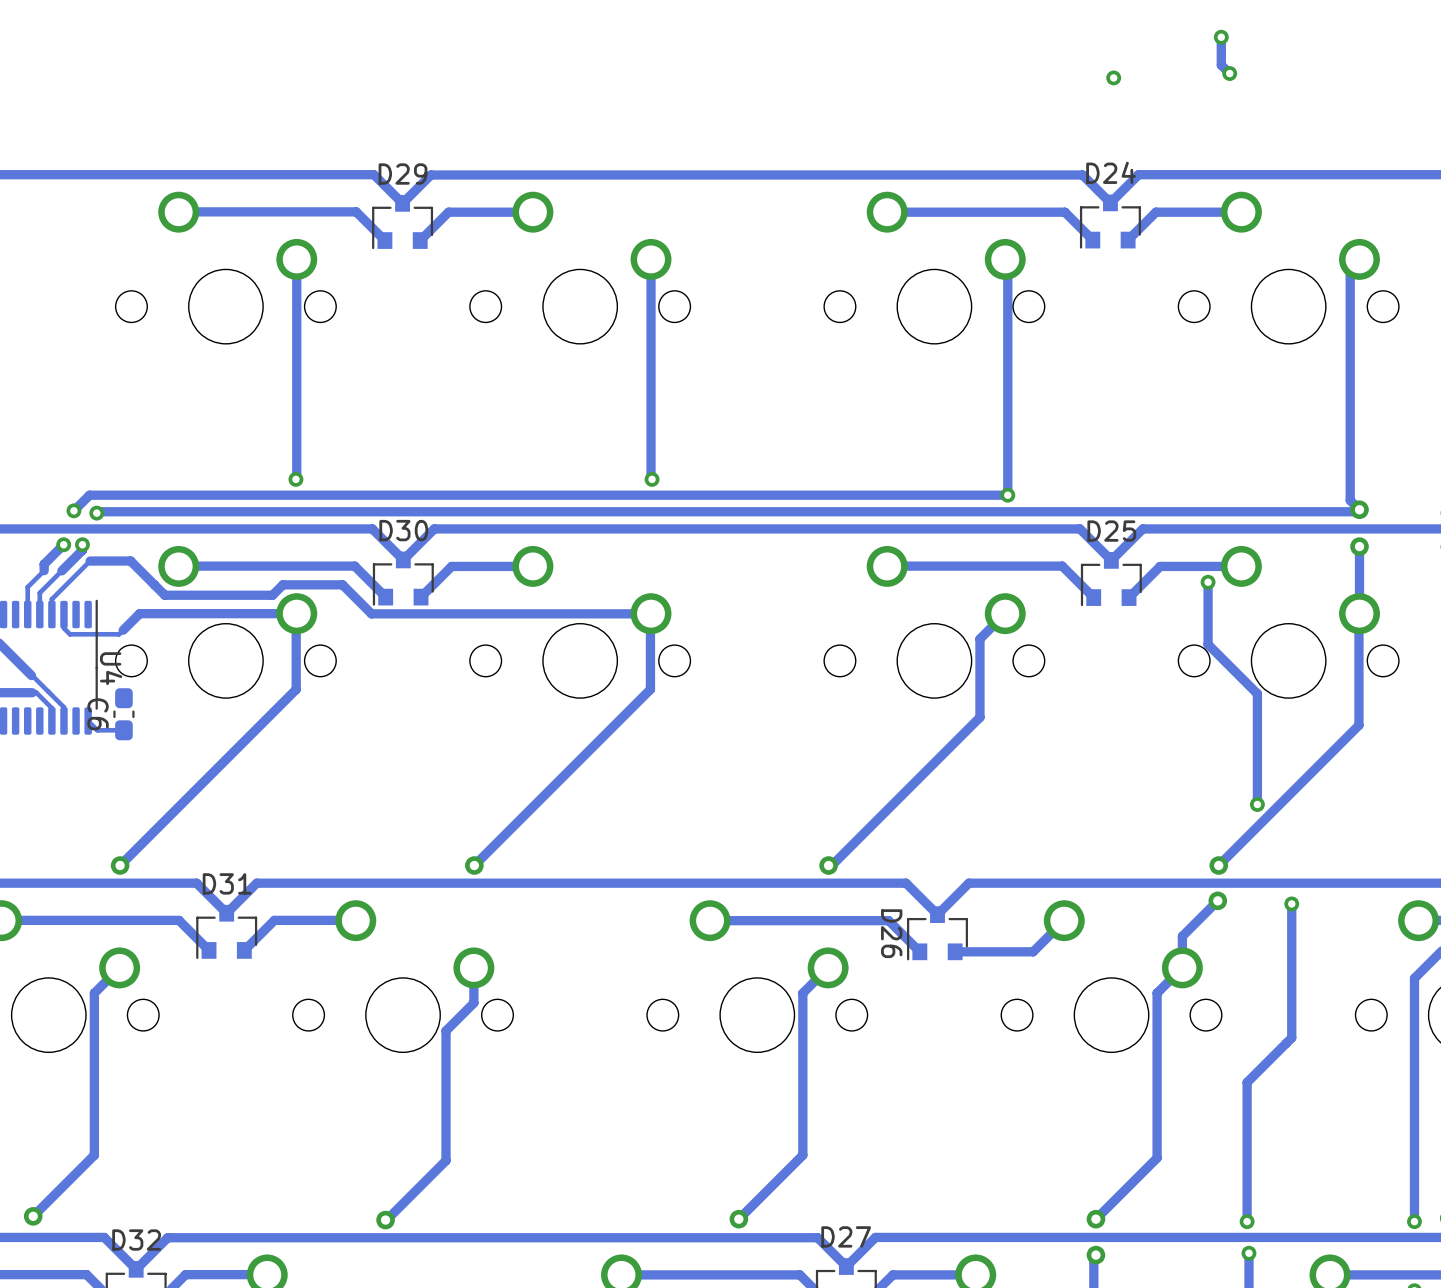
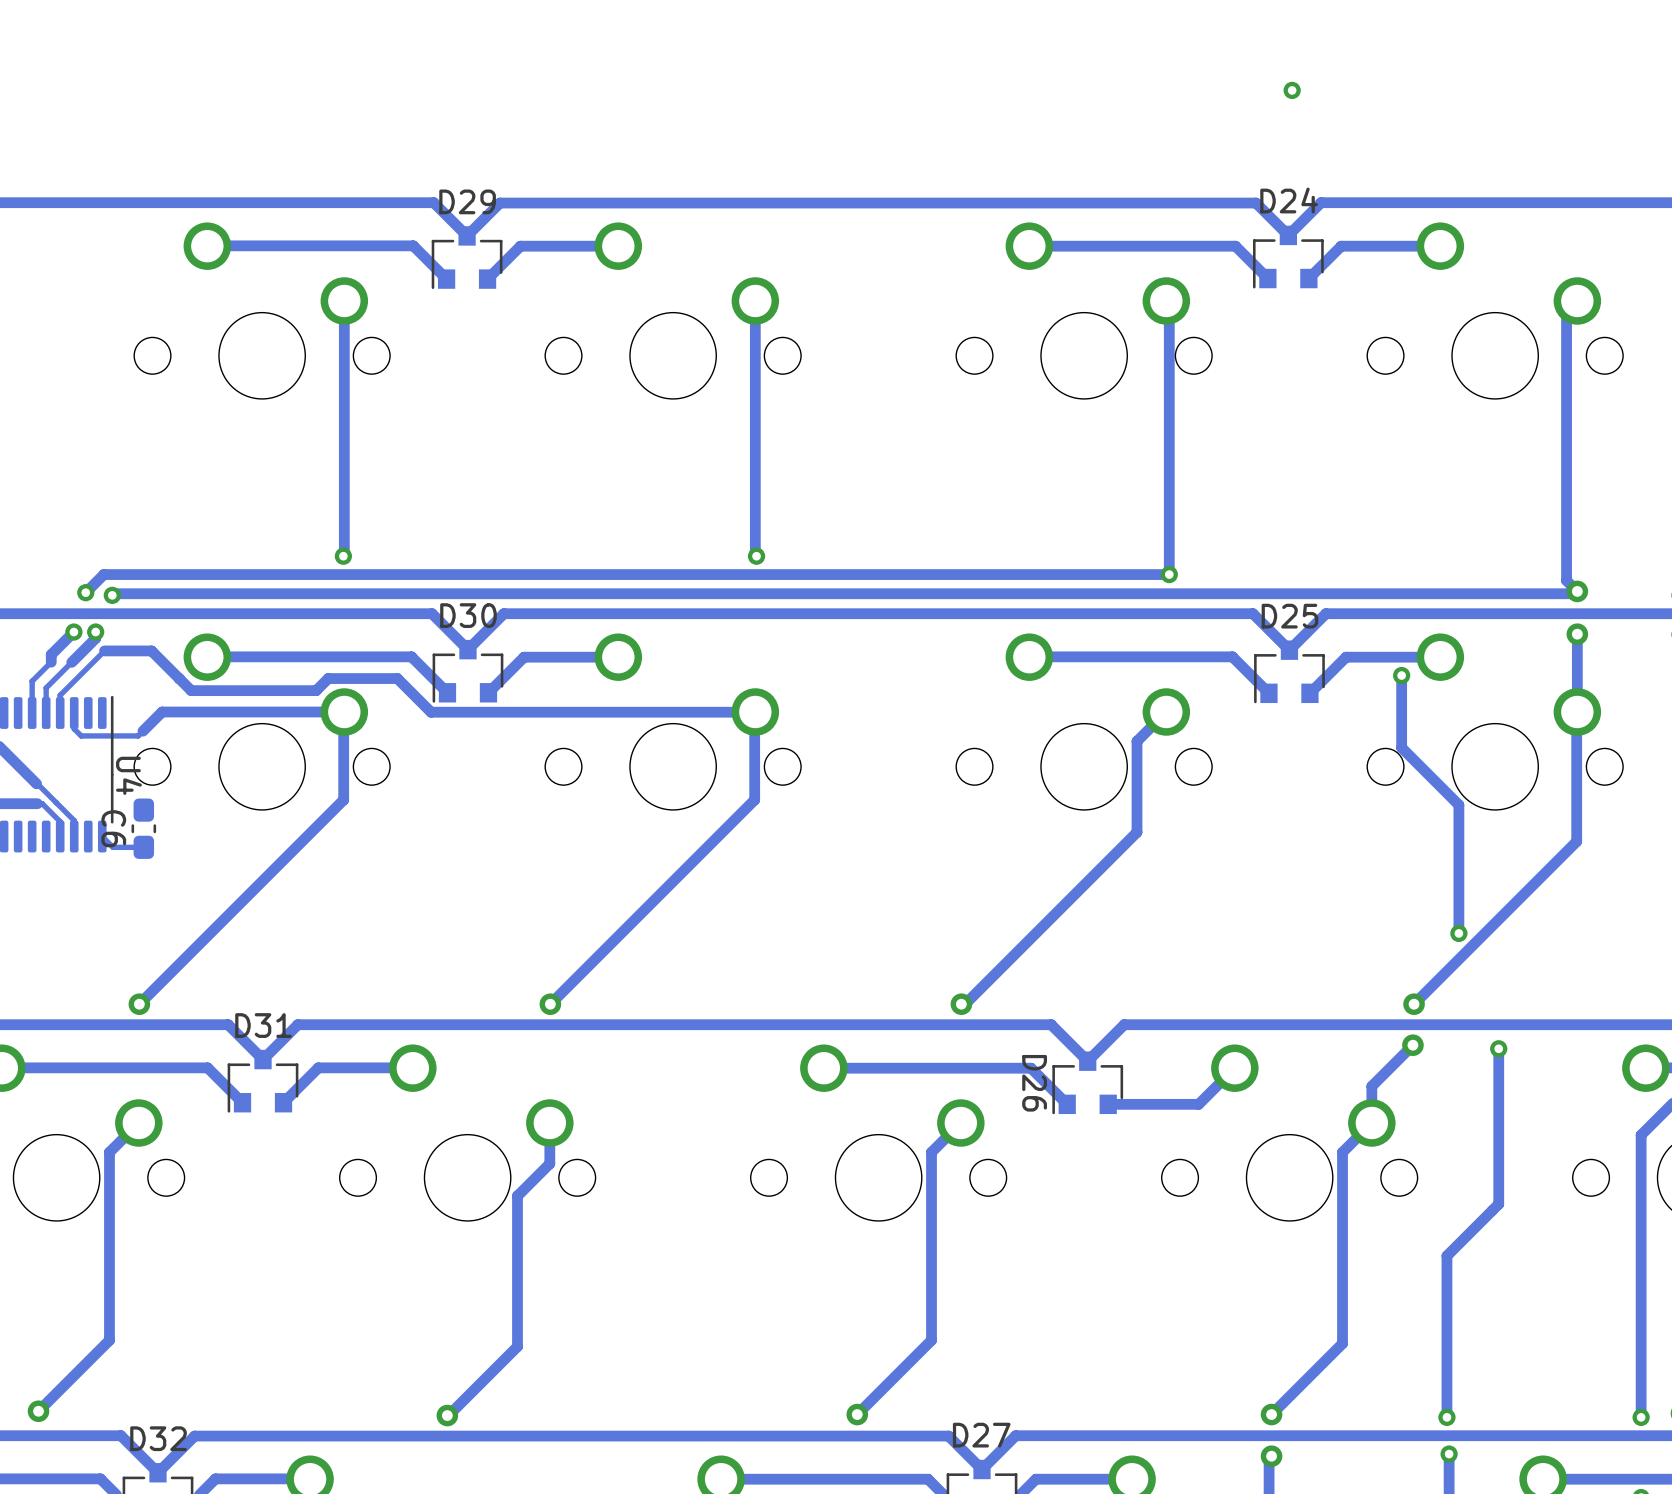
track: (1221, 37) (1221, 65) (1229, 73) -> none
via: (1221, 37) -> none
via: (1229, 73) -> none

